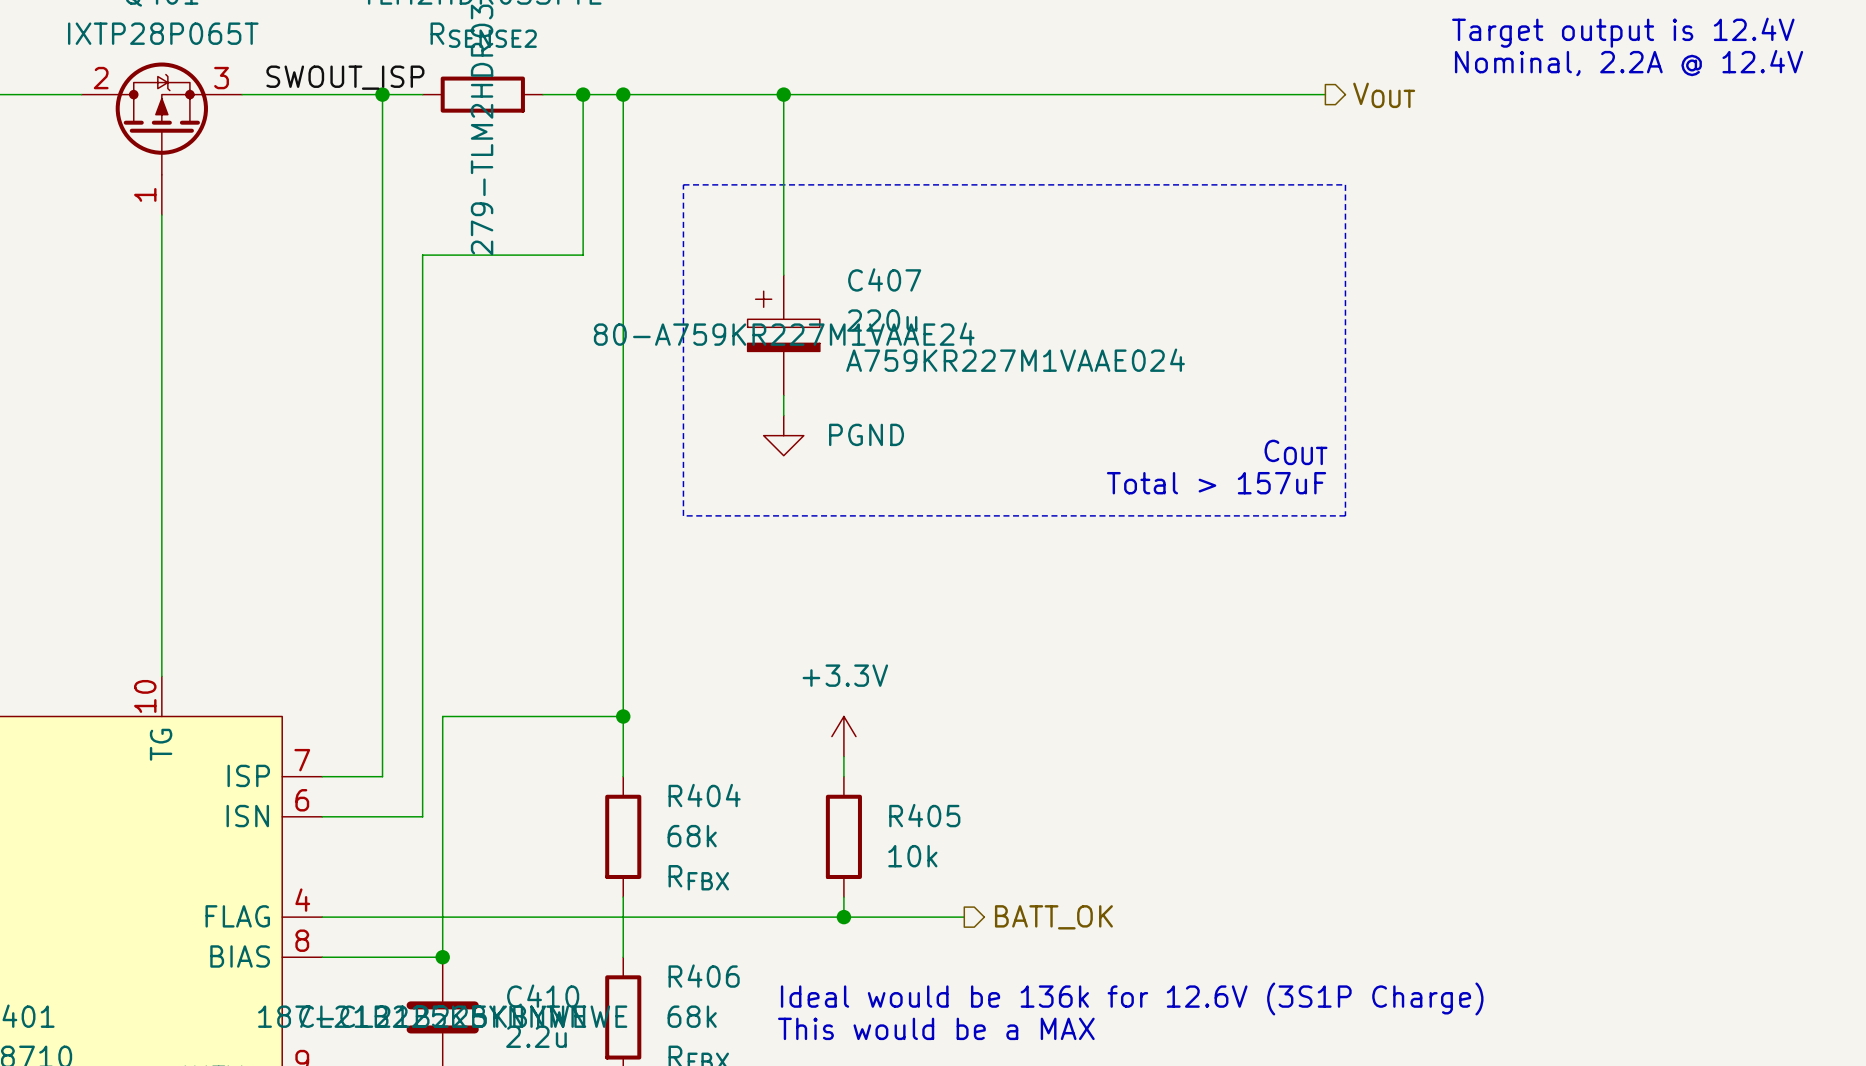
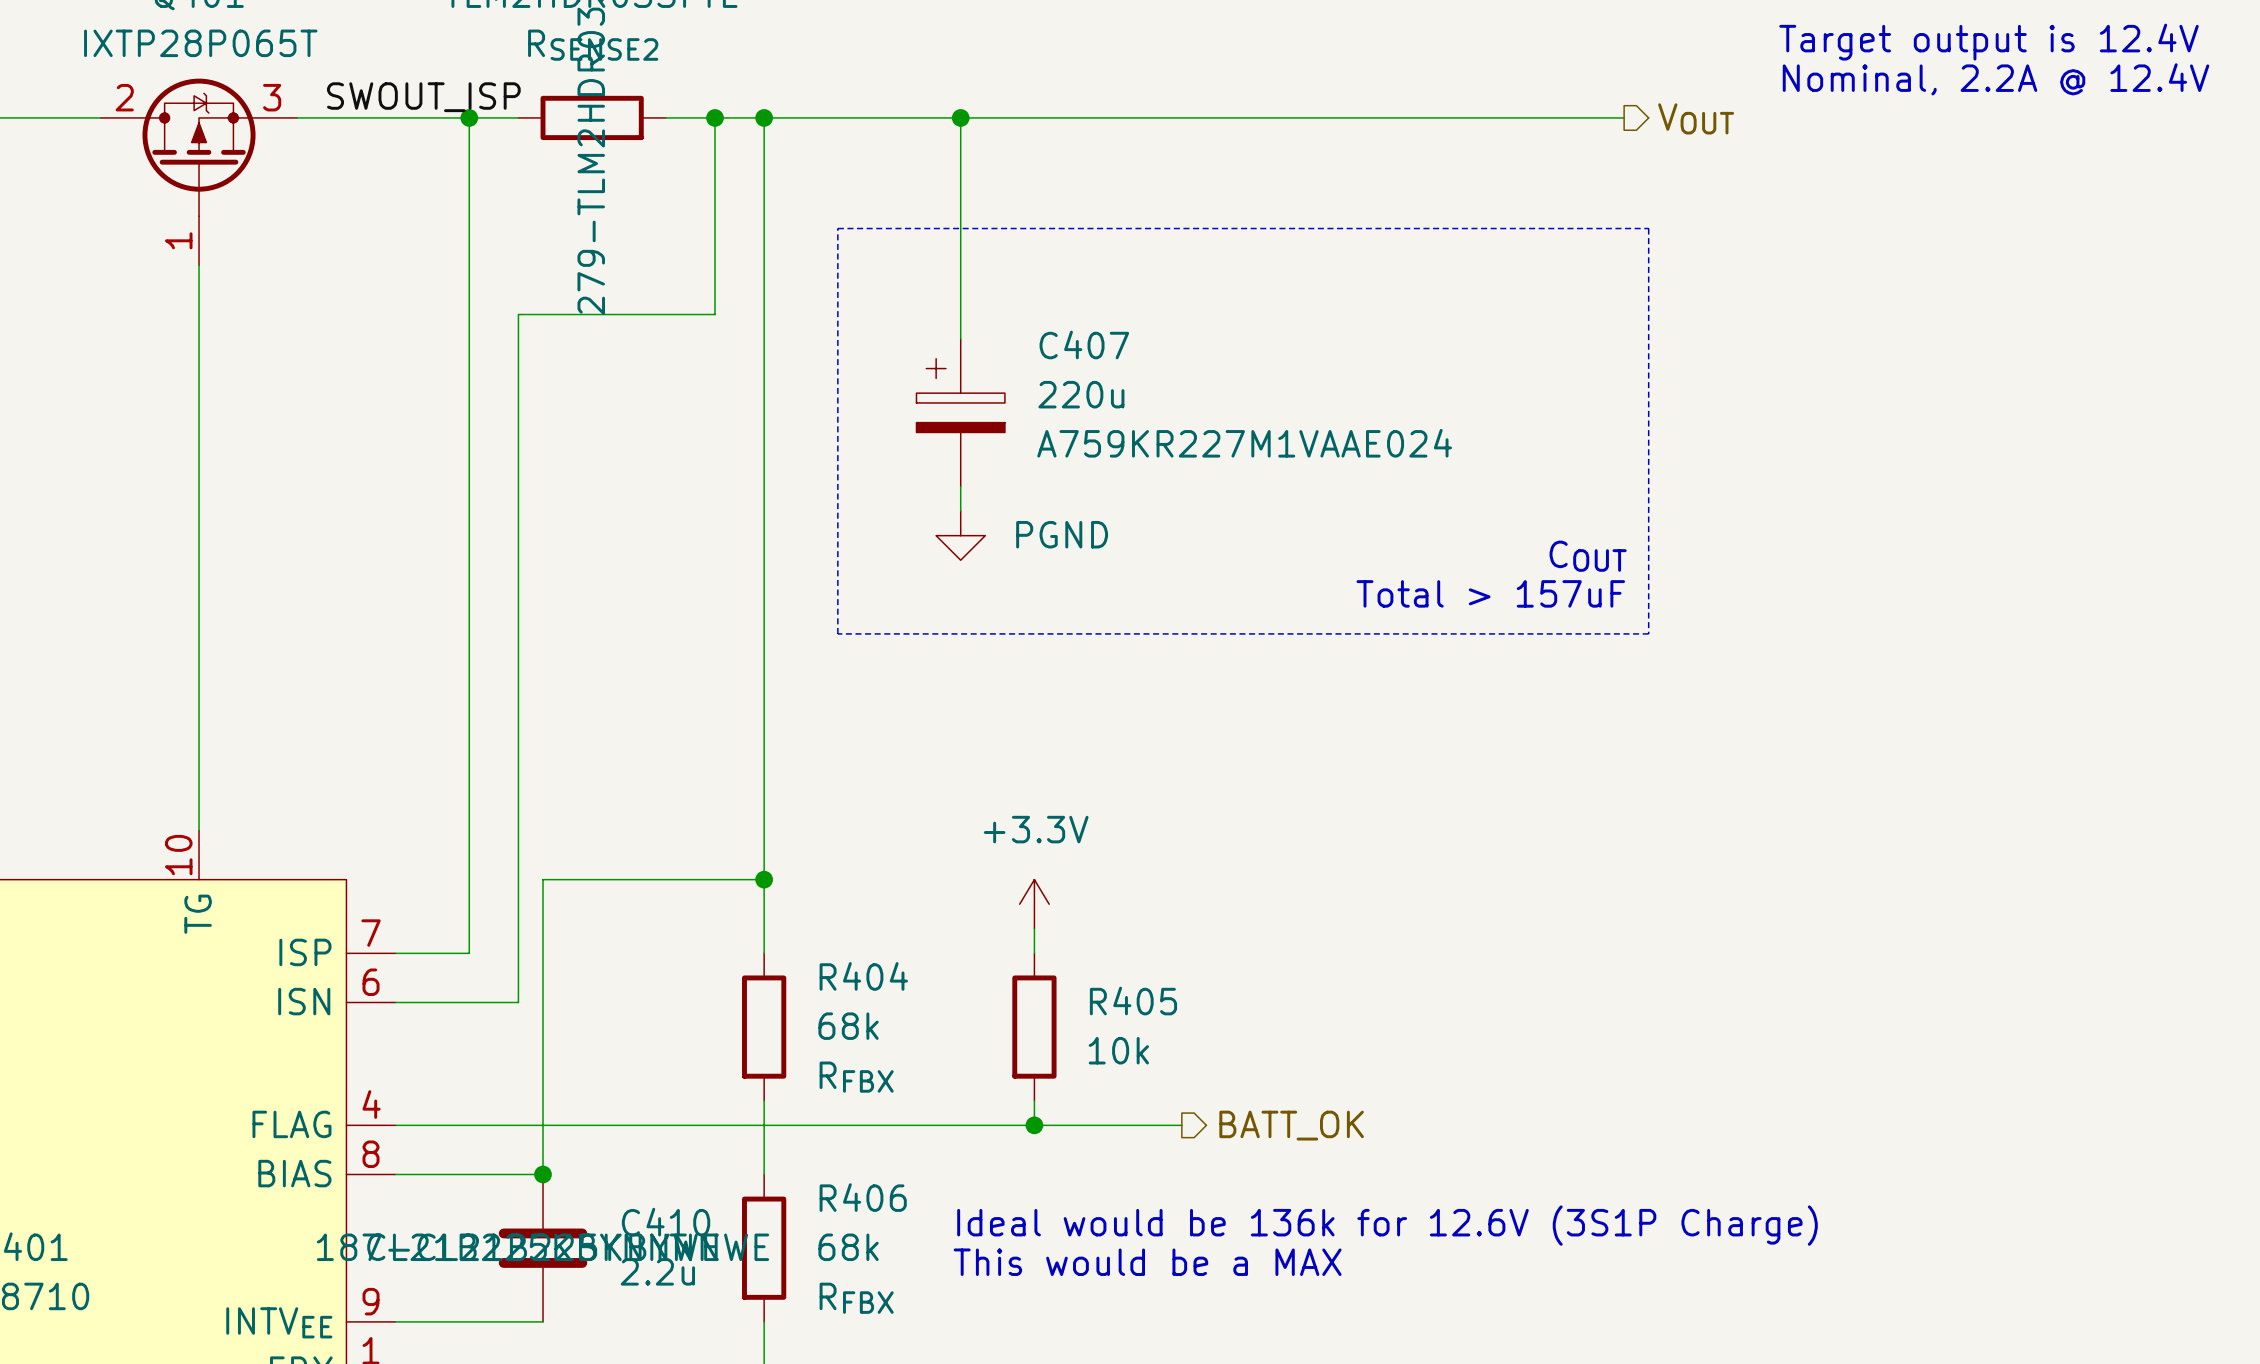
C407 text: 80-A759KR227M1VAAE24 (784, 334) -> none

